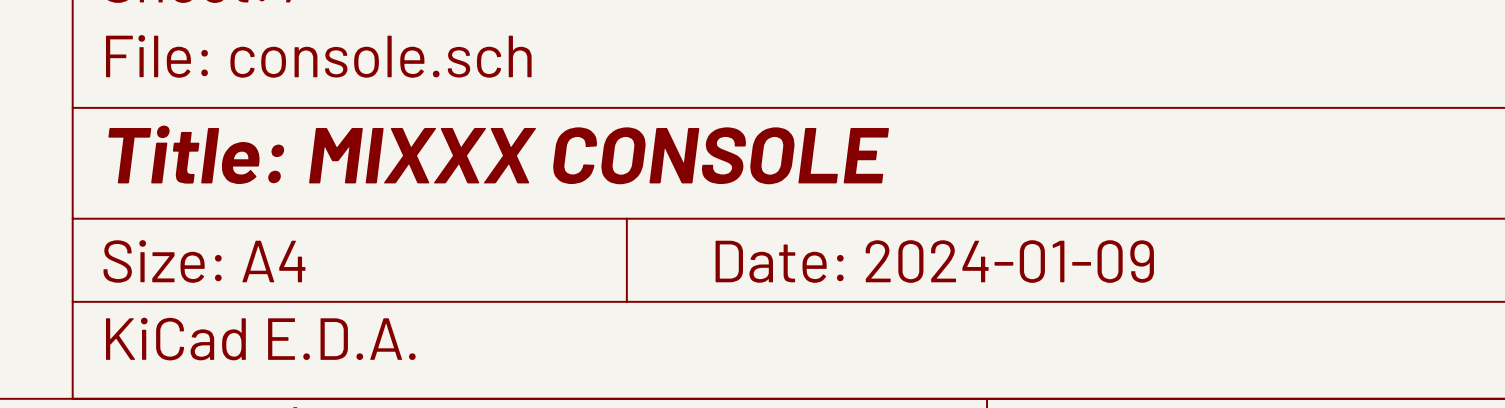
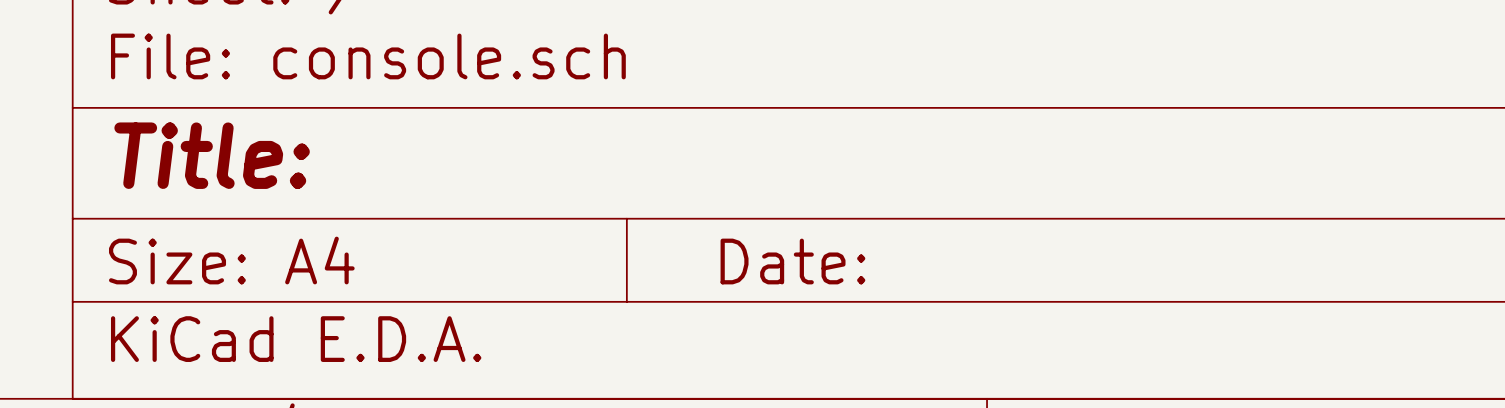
title block: Title: MIXXX CONSOLE (498, 154) -> Title: (212, 155)
title block: Date: 2024-01-09 (934, 261) -> Date: (792, 261)

